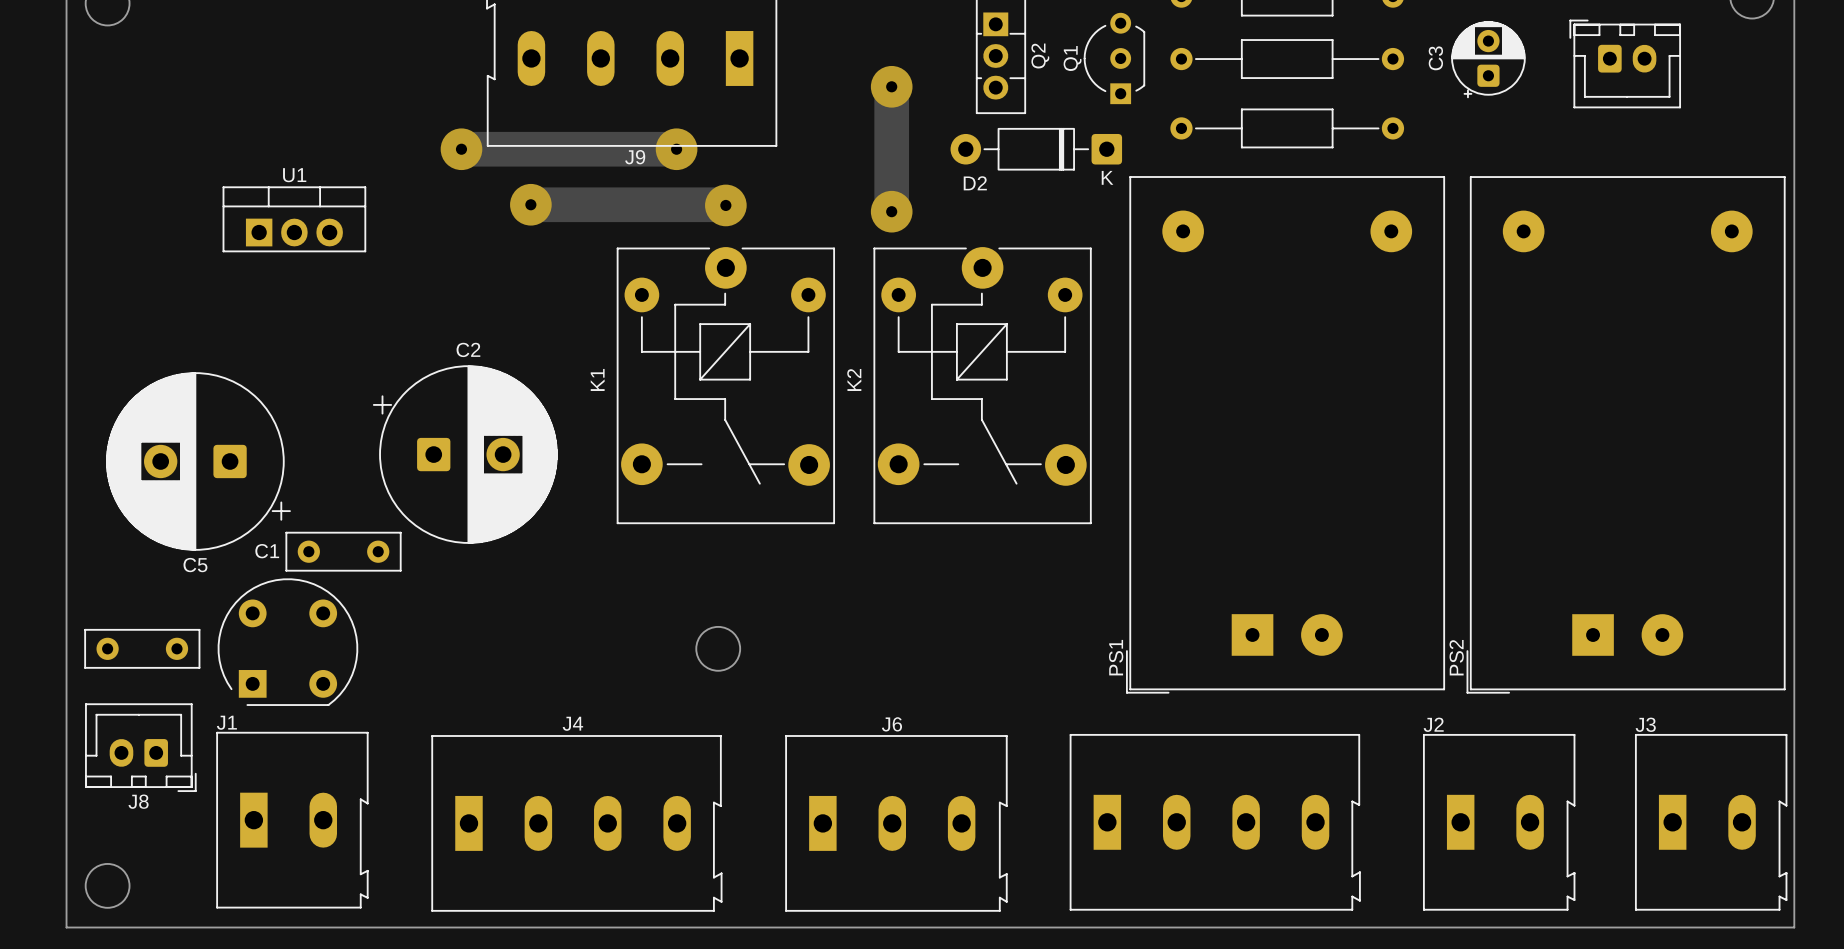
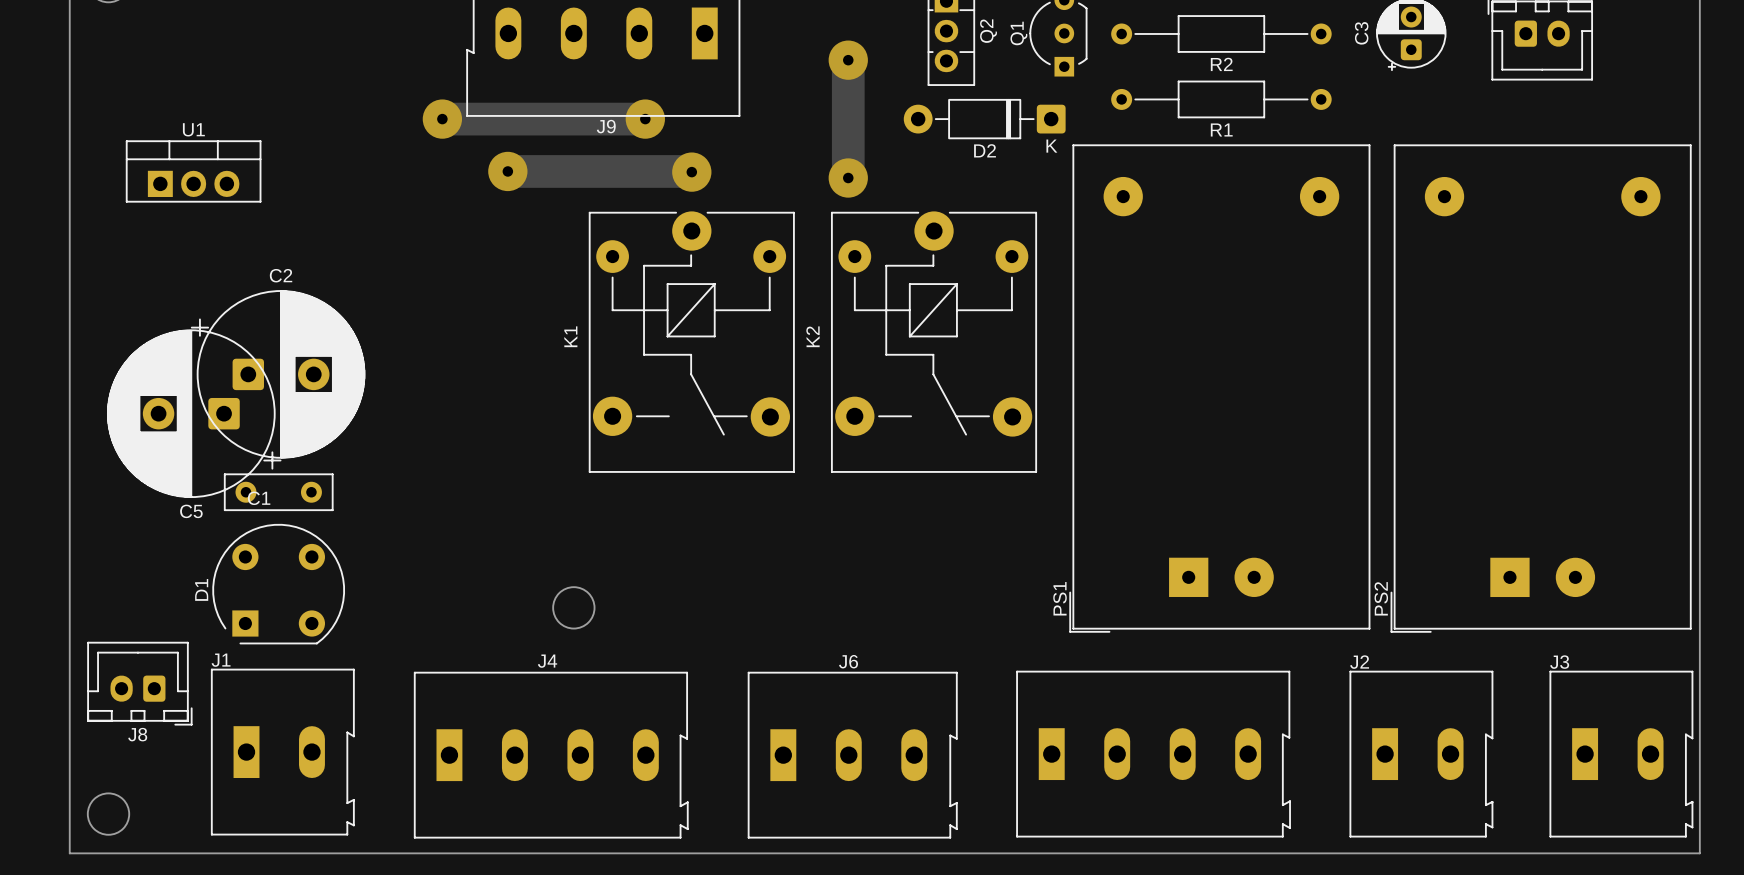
R2 name: none -> R2 (1221, 64)
R1 name: none -> R1 (1221, 129)
D2 name position: D2 (975, 183) -> D2 (985, 150)
U1 position: (294, 219) -> (193, 171)
C2 position: (465, 454) -> (278, 374)
C1 position: (343, 551) -> (278, 492)
part: (142, 648) -> none
D1 name: none -> D1 (201, 589)
round board edge position: (718, 648) -> (573, 607)

